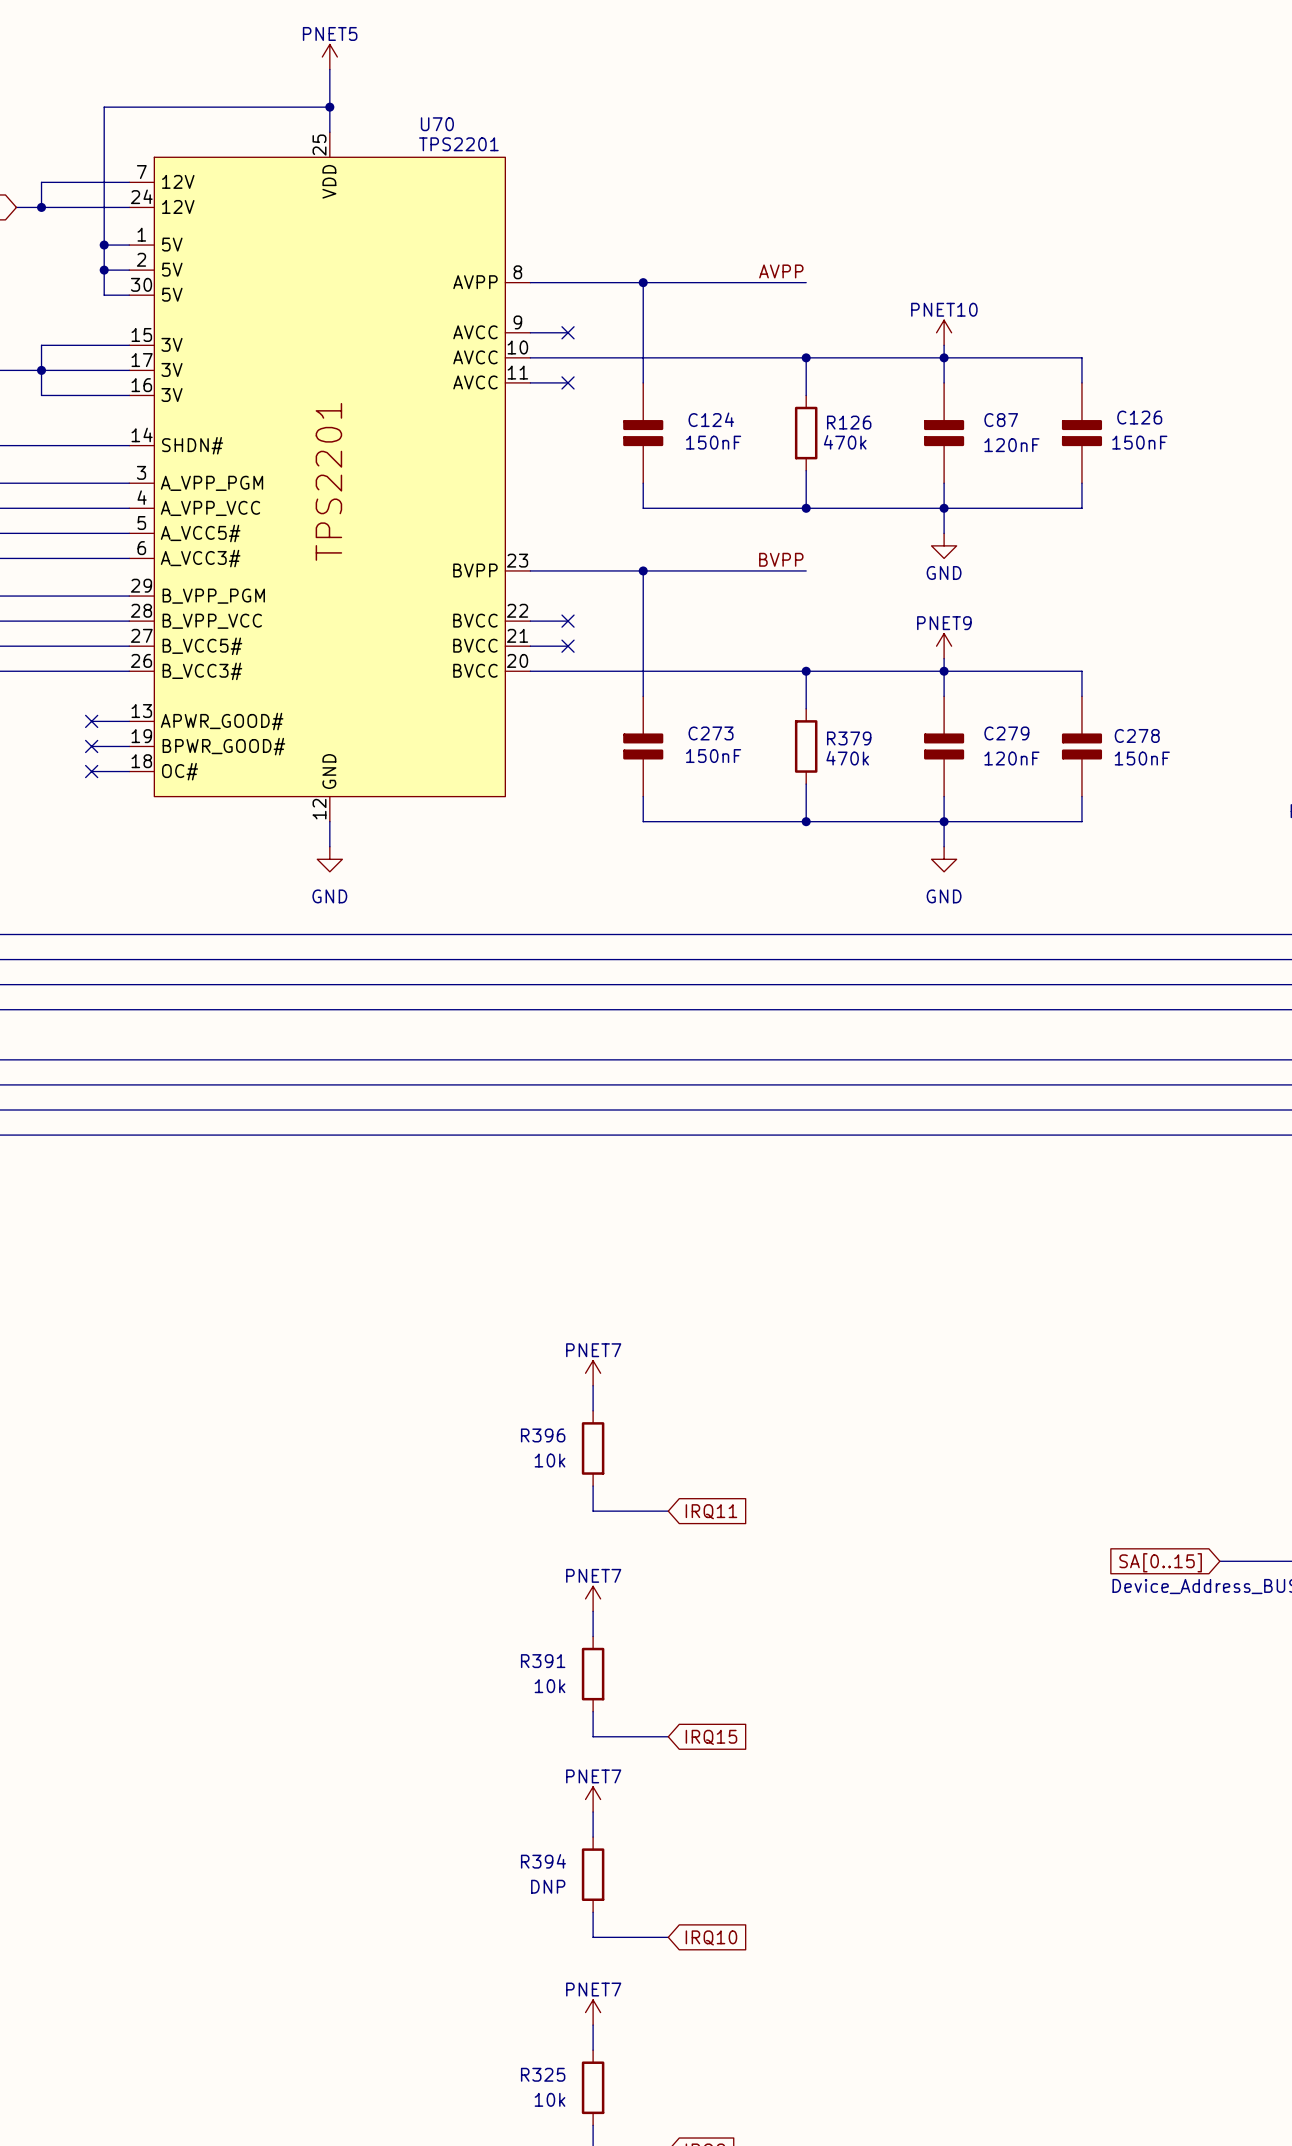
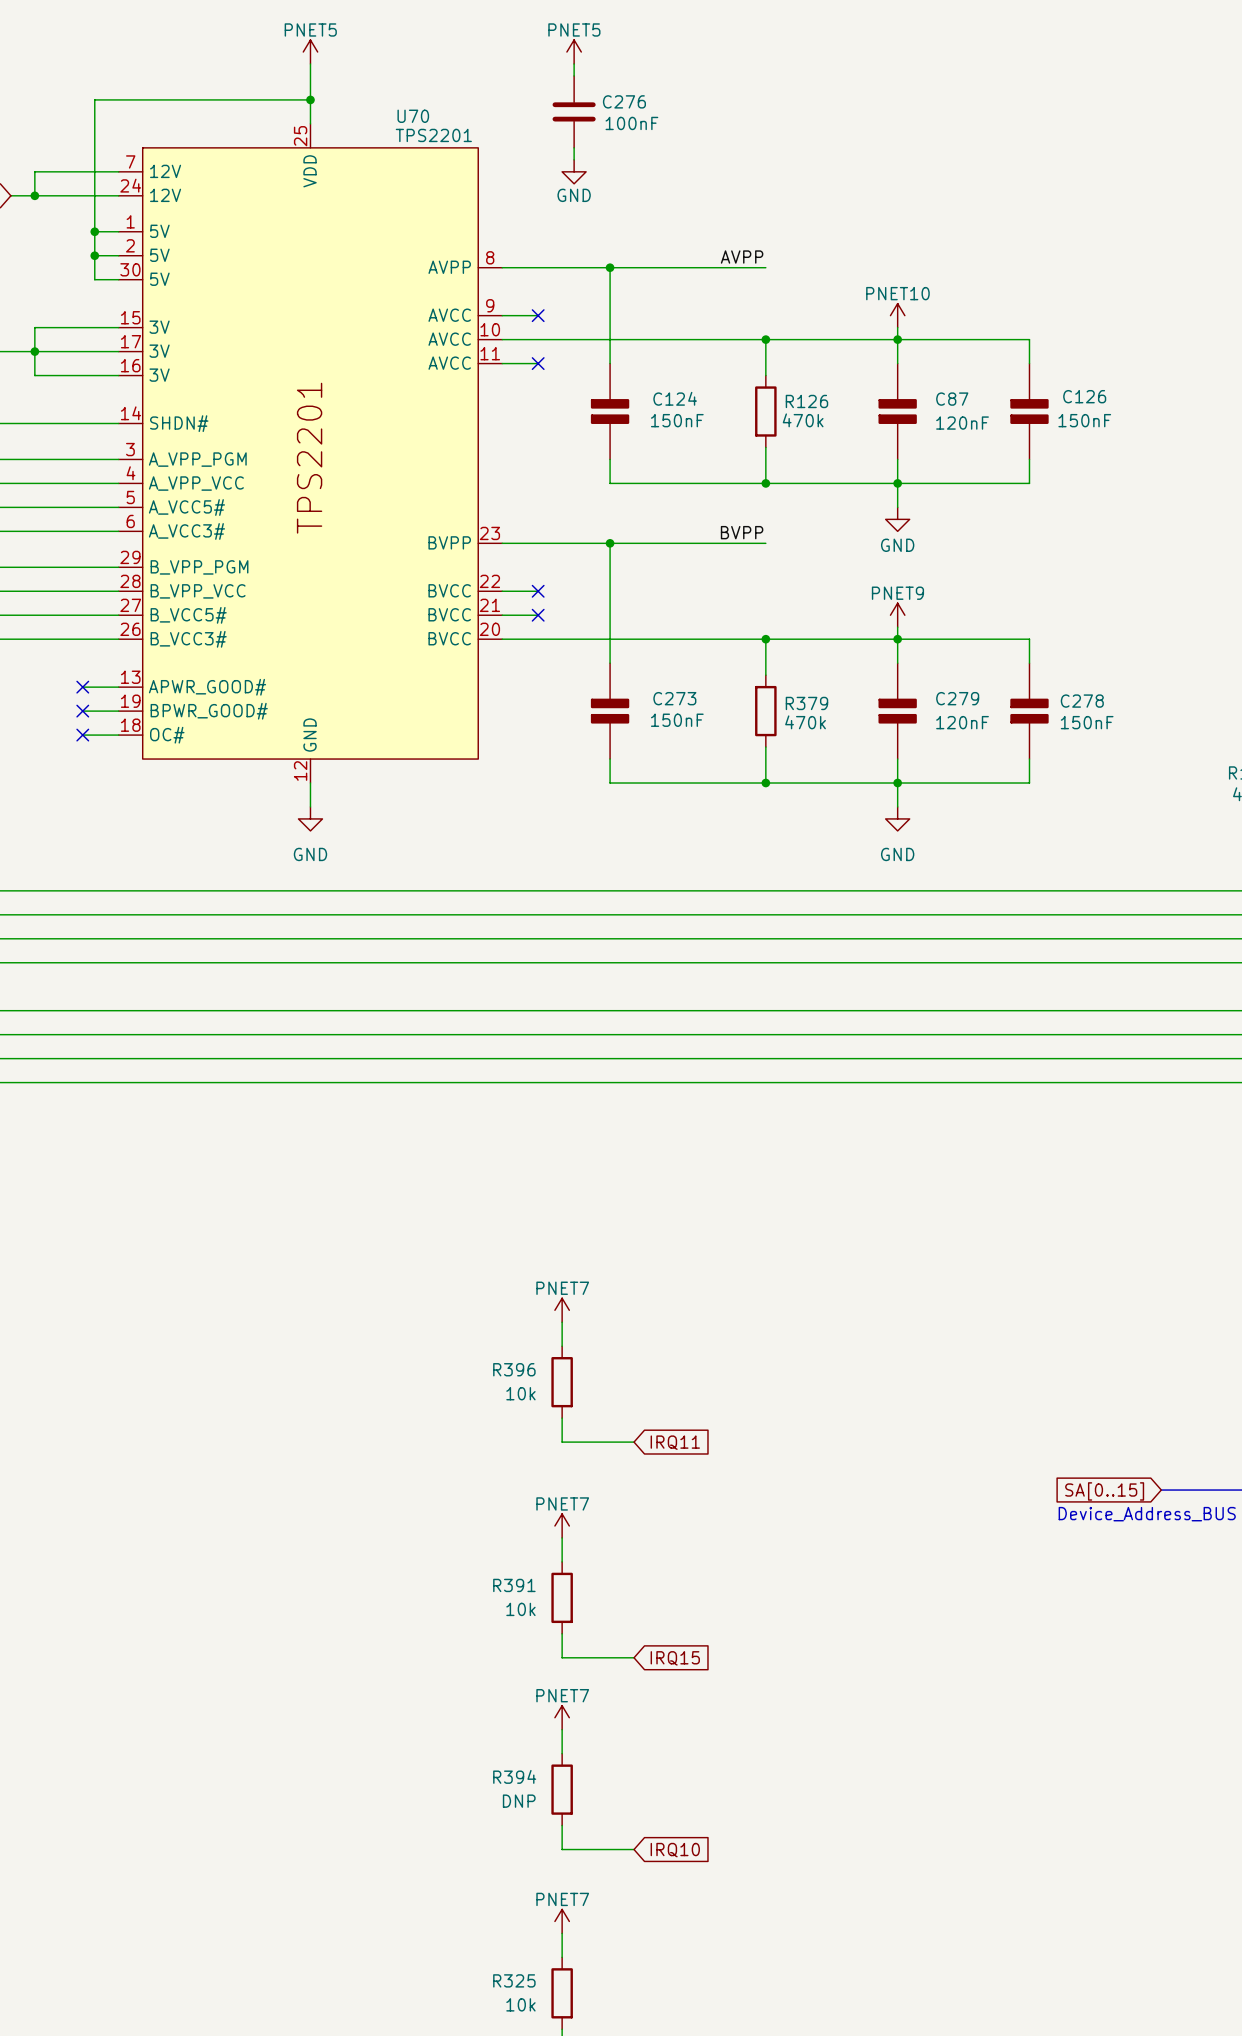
power symbol: none -> PNET5 (574, 52)
wire: none -> (574, 63) (574, 75)
C276: none -> 100nF (574, 111)
wire: none -> (574, 147) (574, 159)
power symbol: none -> GND (574, 171)

